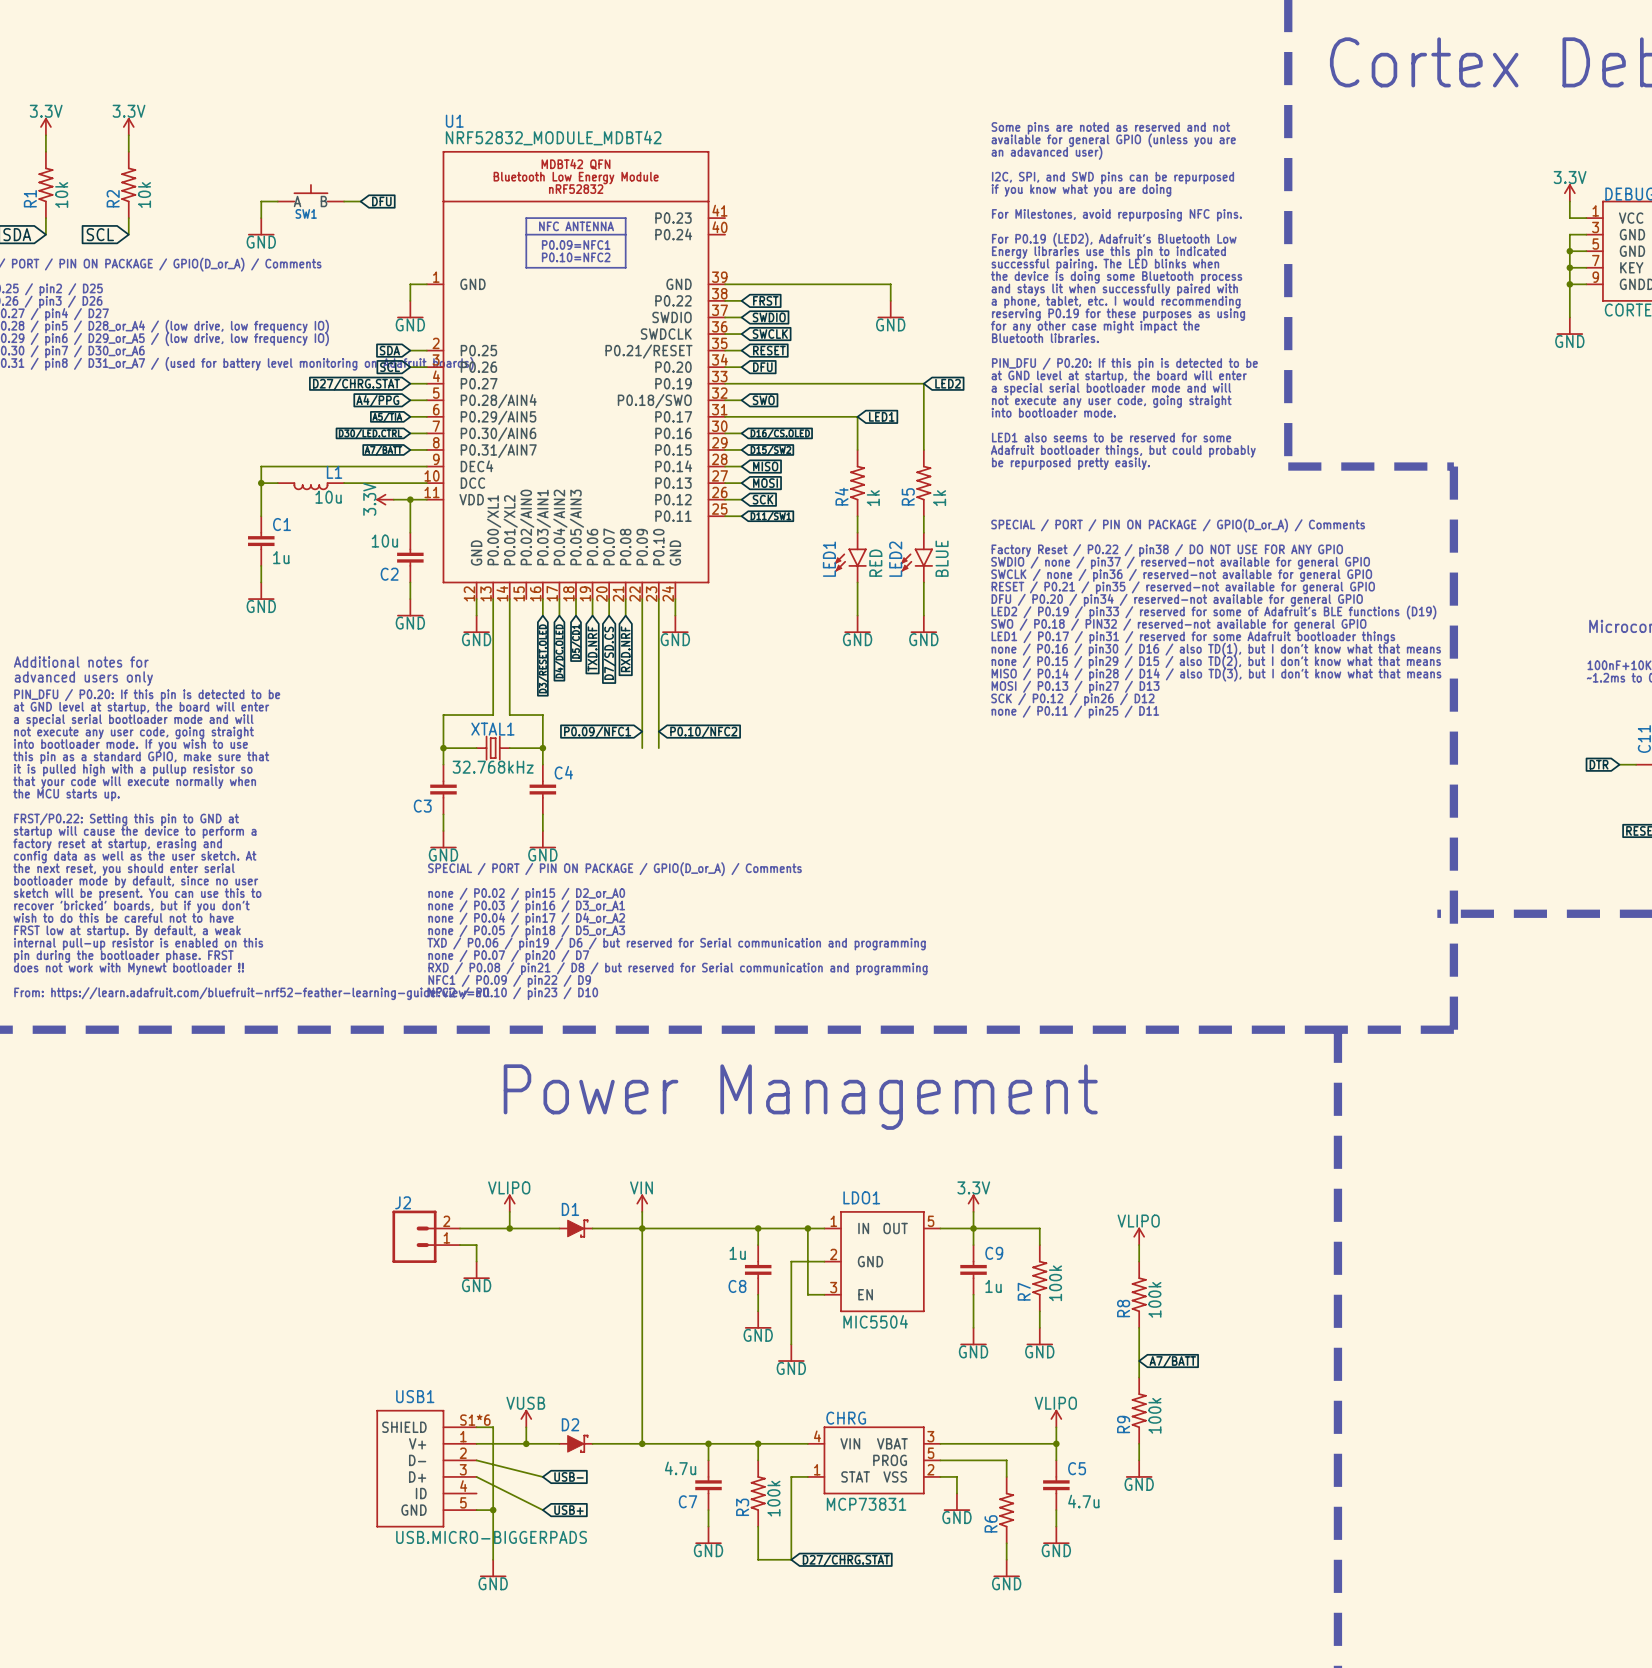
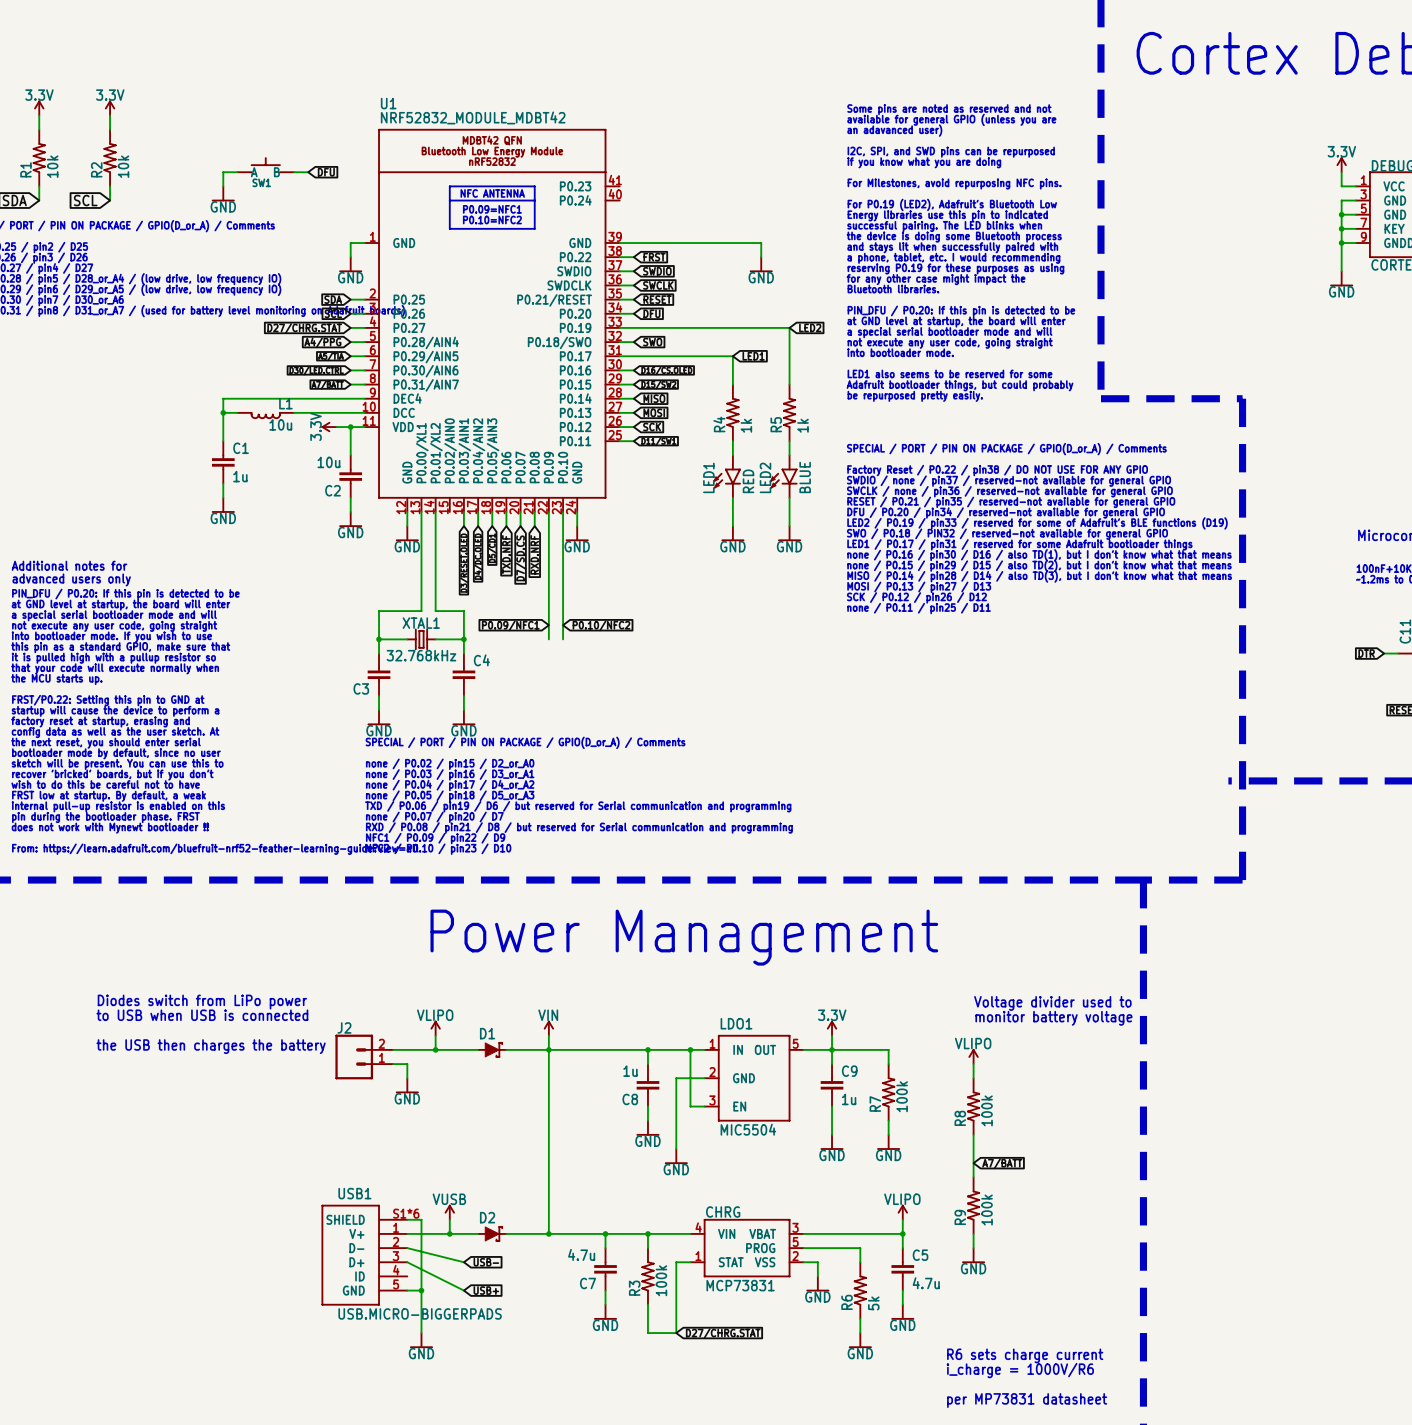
text: none -> Diodes switch from LiPo power (202, 1002)
text: none -> Voltage divider used to (1052, 1003)
text: none -> to USB when USB is connected (202, 1015)
text: none -> monitor battery voltage (1053, 1018)
text: none -> the USB then charges the battery (211, 1046)
R6 value: none -> 5k (873, 1303)
text: none -> R6 sets charge current (1025, 1355)
text: none -> i_charge = 1000V/R6 (1020, 1370)
text: none -> per MP73831 datasheet (1027, 1400)

